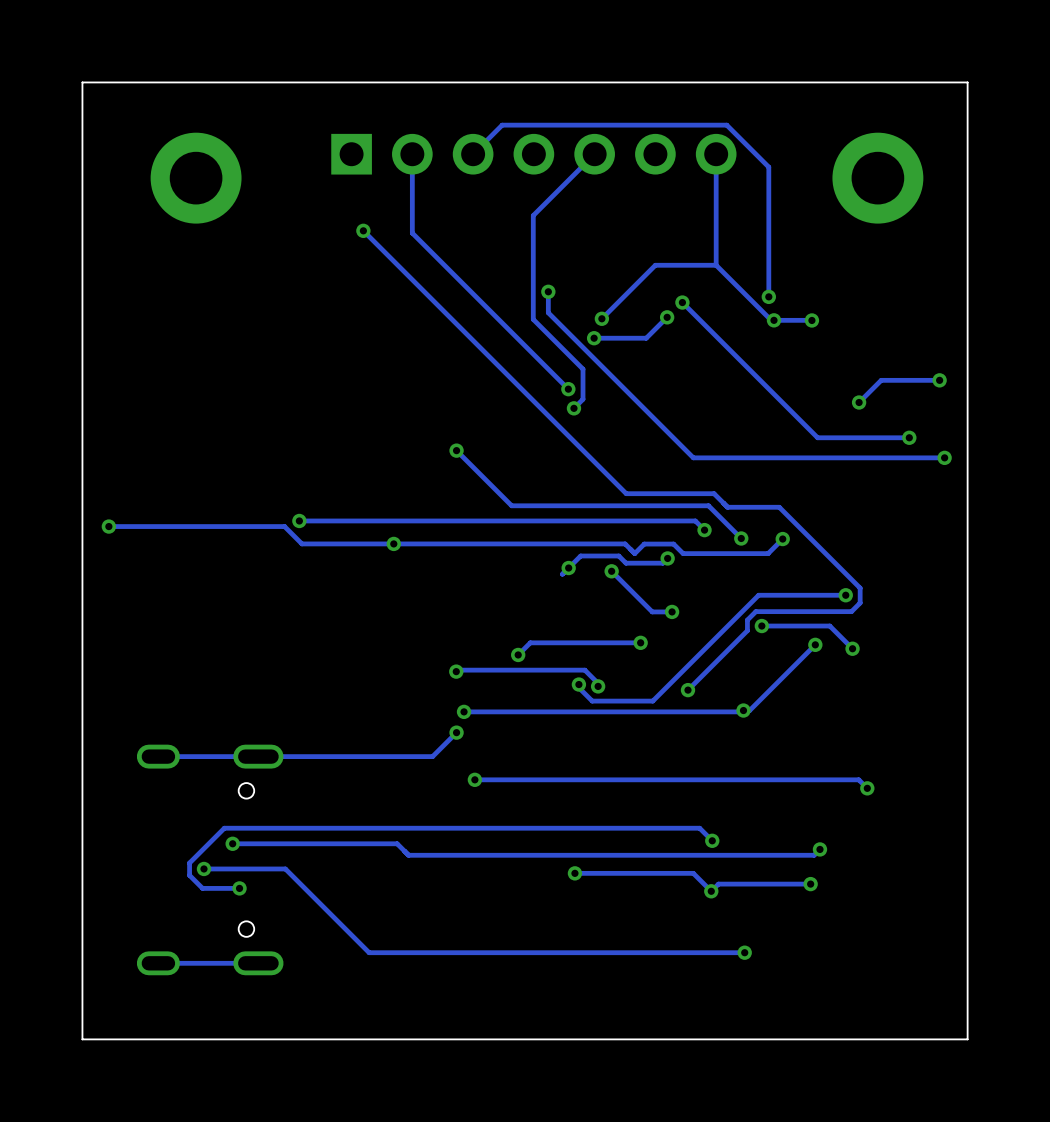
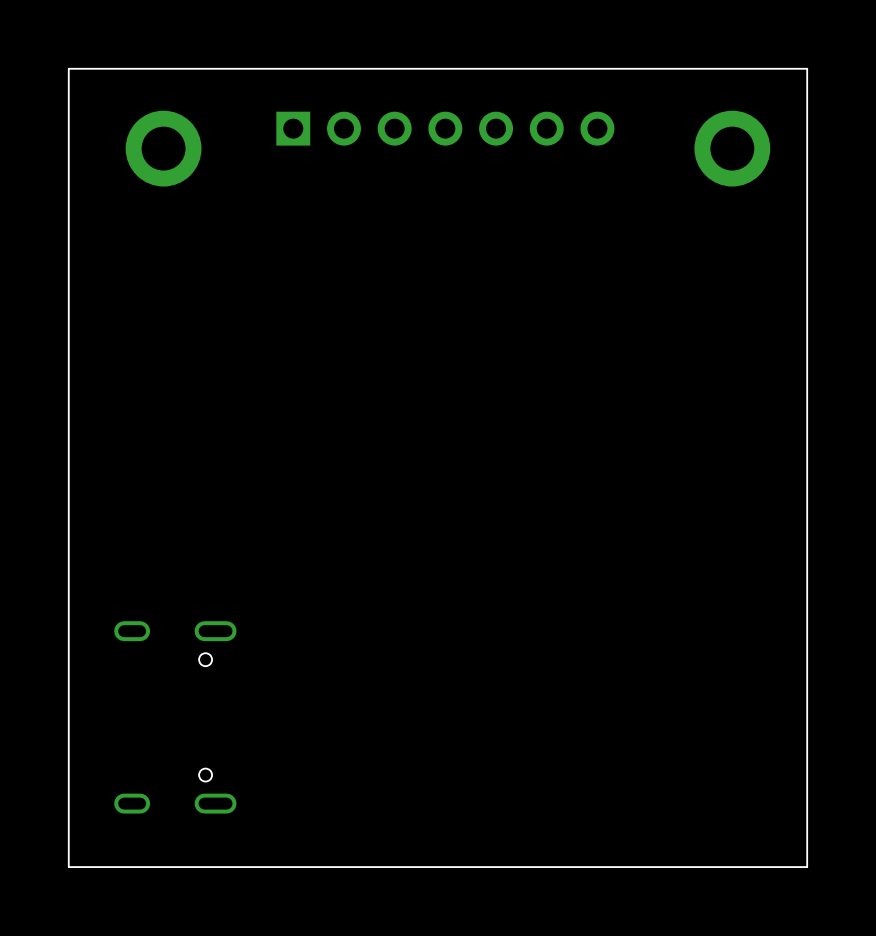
track: (412, 154) (412, 233) (568, 389) -> none
track: (473, 154) (502, 125) (726, 125) (768, 167) (768, 296) -> none
track: (594, 154) (533, 215) (533, 319) (583, 369) (583, 399) (573, 408) -> none
track: (716, 154) (716, 265) -> none
track: (363, 230) (626, 493) (714, 493) (727, 507) (779, 507) (860, 588) (860, 602) (851, 611) (755, 611) (747, 620) (747, 630) (687, 690) -> none
via: (363, 230) -> none
track: (716, 265) (655, 265) (601, 318) -> none
track: (716, 265) (771, 320) (811, 320) -> none
track: (548, 291) (548, 312) (693, 457) (944, 457) -> none
via: (548, 291) -> none
via: (768, 296) -> none
track: (682, 302) (817, 437) (909, 437) -> none
via: (682, 302) -> none
track: (667, 317) (646, 338) (594, 338) -> none
via: (667, 317) -> none
via: (601, 318) -> none
via: (773, 320) -> none
via: (811, 320) -> none
via: (594, 338) -> none
track: (939, 380) (881, 380) (859, 402) -> none
via: (939, 380) -> none
via: (568, 389) -> none
via: (859, 402) -> none
via: (573, 408) -> none
via: (909, 437) -> none
track: (456, 450) (511, 505) (708, 505) (741, 538) -> none
via: (456, 450) -> none
via: (944, 457) -> none
track: (299, 520) (695, 520) (704, 530) -> none
via: (299, 520) -> none
track: (108, 526) (284, 526) (301, 543) (625, 543) (634, 553) (644, 544) (673, 544) (683, 553) (768, 553) (782, 539) -> none
via: (108, 526) -> none
via: (704, 530) -> none
via: (741, 538) -> none
via: (782, 539) -> none
via: (393, 543) -> none
track: (667, 558) (662, 563) (626, 563) (618, 556) (580, 556) (562, 574) -> none
via: (667, 558) -> none
via: (568, 568) -> none
track: (611, 571) (652, 611) (672, 611) -> none
via: (611, 571) -> none
track: (845, 595) (758, 595) (652, 701) (592, 701) (578, 687) (578, 684) -> none
via: (845, 595) -> none
via: (672, 611) -> none
track: (761, 626) (829, 626) (852, 648) -> none
via: (761, 626) -> none
track: (640, 642) (530, 642) (518, 654) -> none
via: (640, 642) -> none
track: (815, 644) (749, 710) (464, 711) -> none
via: (815, 644) -> none
via: (852, 648) -> none
via: (518, 654) -> none
track: (456, 671) (584, 670) (598, 683) (598, 686) -> none
via: (456, 671) -> none
via: (578, 684) -> none
via: (598, 686) -> none
via: (687, 690) -> none
via: (743, 710) -> none
via: (464, 711) -> none
track: (456, 732) (432, 756) (158, 756) -> none
via: (456, 732) -> none
track: (474, 779) (858, 779) (867, 788) -> none
via: (474, 779) -> none
via: (867, 788) -> none
track: (712, 840) (699, 828) (224, 828) (189, 863) (189, 875) (202, 888) (239, 888) -> none
via: (712, 840) -> none
track: (232, 843) (397, 843) (408, 855) (814, 855) (819, 849) -> none
via: (232, 843) -> none
via: (819, 849) -> none
track: (203, 868) (285, 868) (369, 952) (744, 952) -> none
via: (203, 868) -> none
track: (574, 873) (693, 873) (711, 891) (718, 884) (810, 884) -> none
via: (574, 873) -> none
via: (810, 884) -> none
via: (239, 888) -> none
via: (711, 891) -> none
via: (744, 952) -> none
track: (258, 963) (158, 963) -> none

